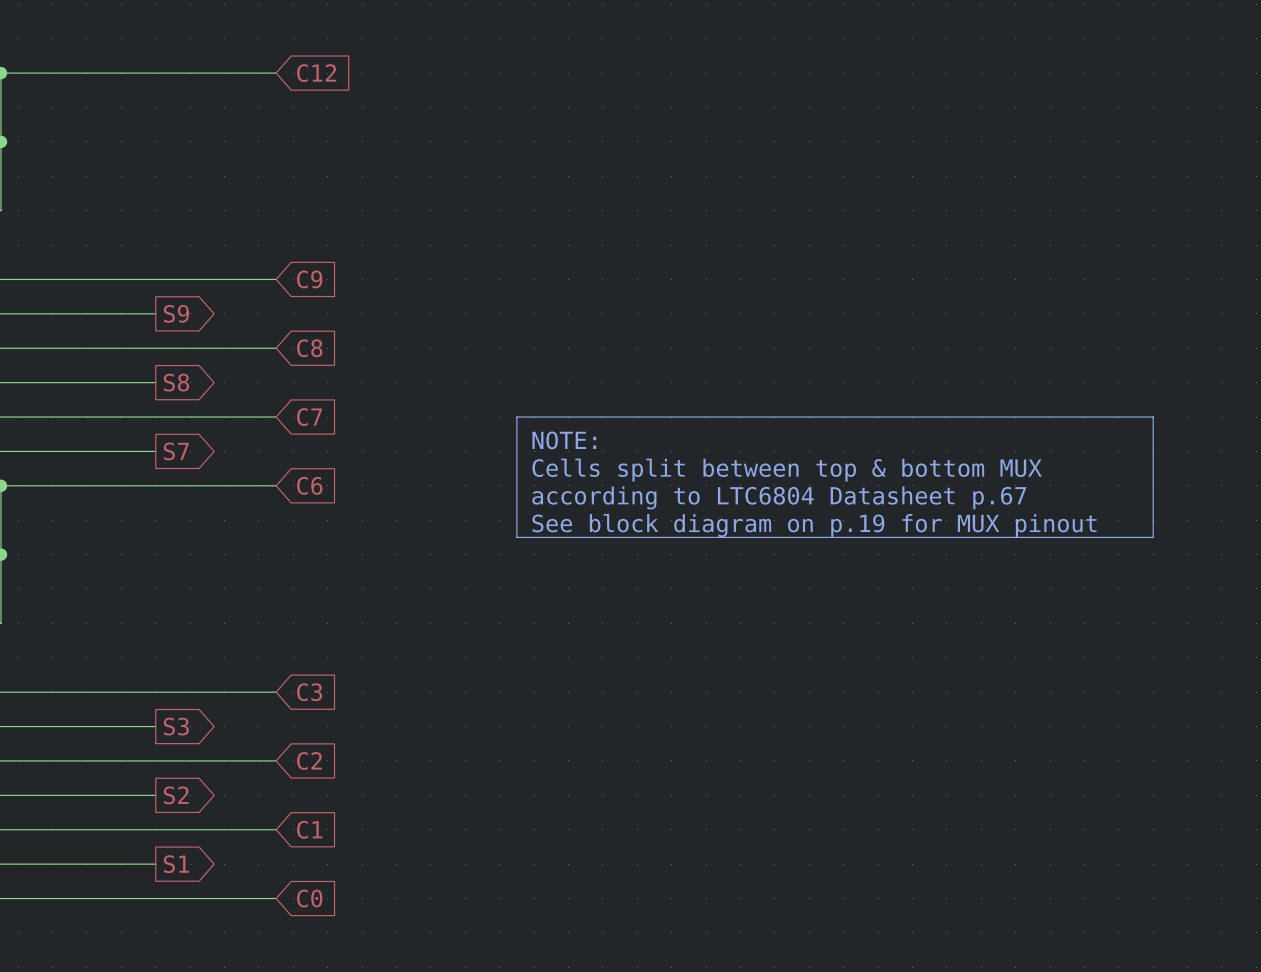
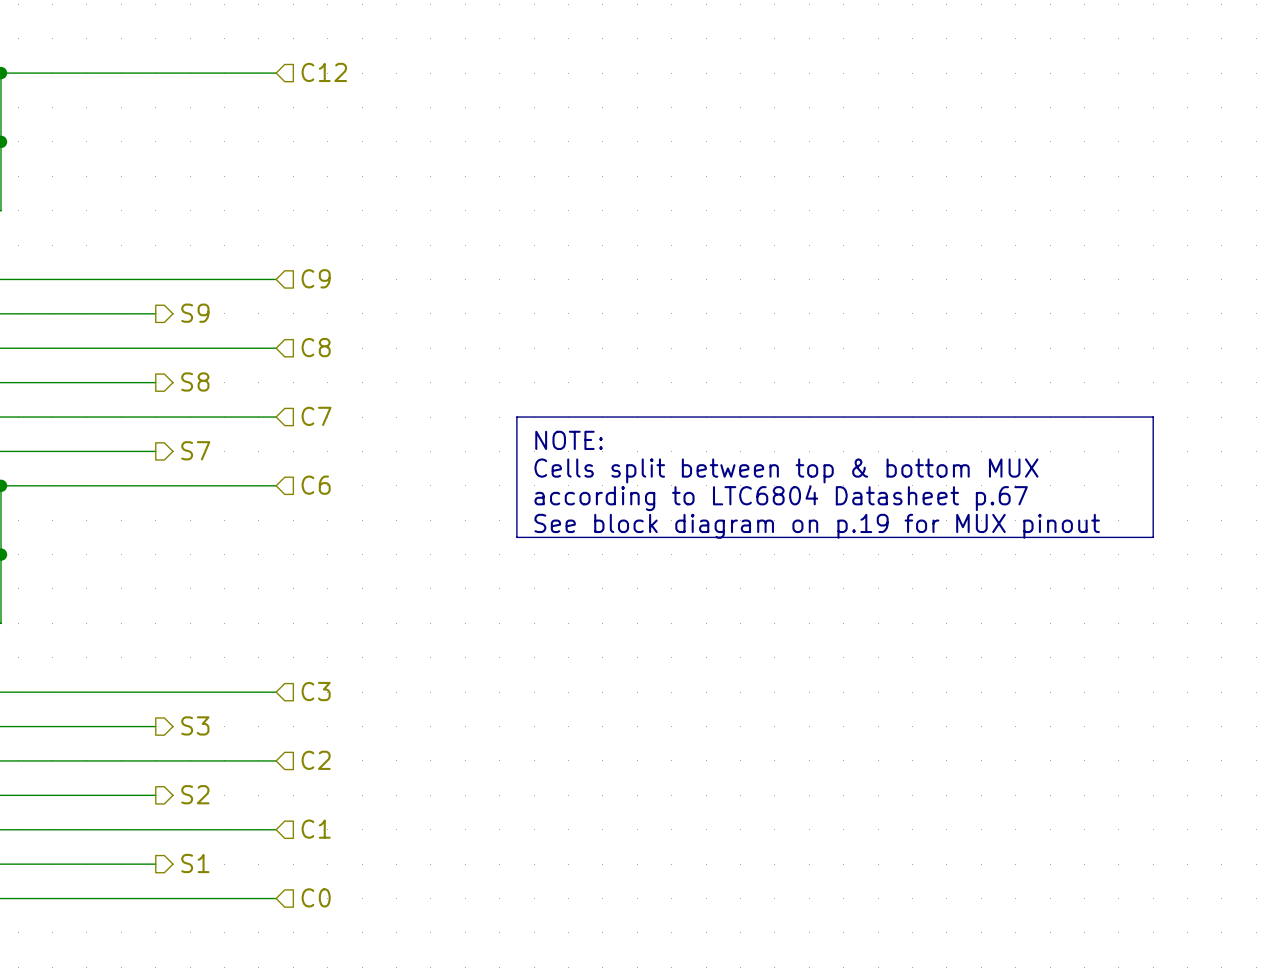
hierarchical label: none -> C12 (324, 72)
global label: C12 (316, 73) -> none
hierarchical label: none -> C9 (316, 278)
global label: C9 (309, 279) -> none
global label: S9 (176, 313) -> none
hierarchical label: none -> S9 (195, 313)
hierarchical label: none -> C8 (316, 347)
global label: C8 (309, 348) -> none
global label: S8 (176, 382) -> none
hierarchical label: none -> S8 (195, 381)
hierarchical label: none -> C7 (316, 416)
global label: C7 (309, 417) -> none
hierarchical label: none -> S7 (195, 450)
global label: S7 (176, 451) -> none
global label: C6 (309, 485) -> none
hierarchical label: none -> C6 (316, 485)
hierarchical label: none -> C3 (316, 691)
global label: C3 (309, 692) -> none
hierarchical label: none -> S3 (195, 725)
global label: S3 (176, 726) -> none
global label: C2 (309, 760) -> none
hierarchical label: none -> C2 (316, 760)
hierarchical label: none -> S2 (195, 794)
global label: S2 (176, 795) -> none
global label: C1 (309, 829) -> none
hierarchical label: none -> C1 (316, 829)
hierarchical label: none -> S1 (195, 863)
global label: S1 (176, 864) -> none
hierarchical label: none -> C0 (316, 897)
global label: C0 (309, 898) -> none

